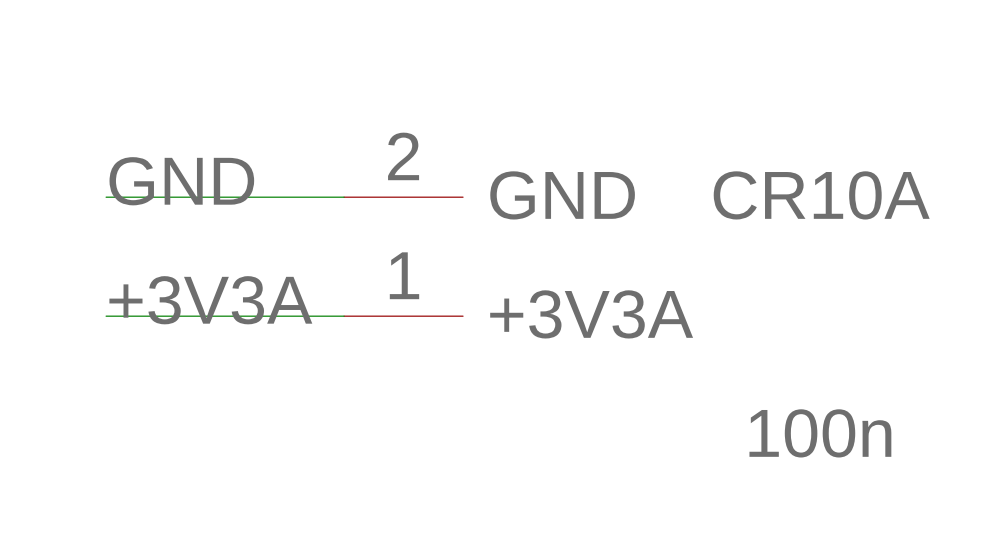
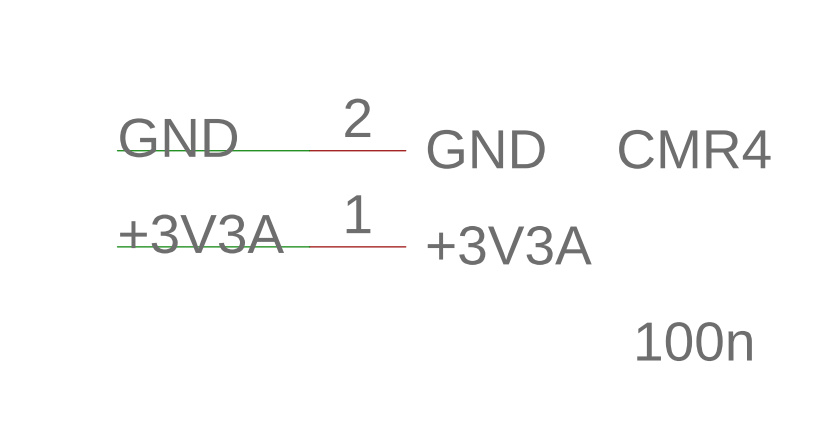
CR10A name: CR10A (821, 195) -> CMR4 (694, 149)

